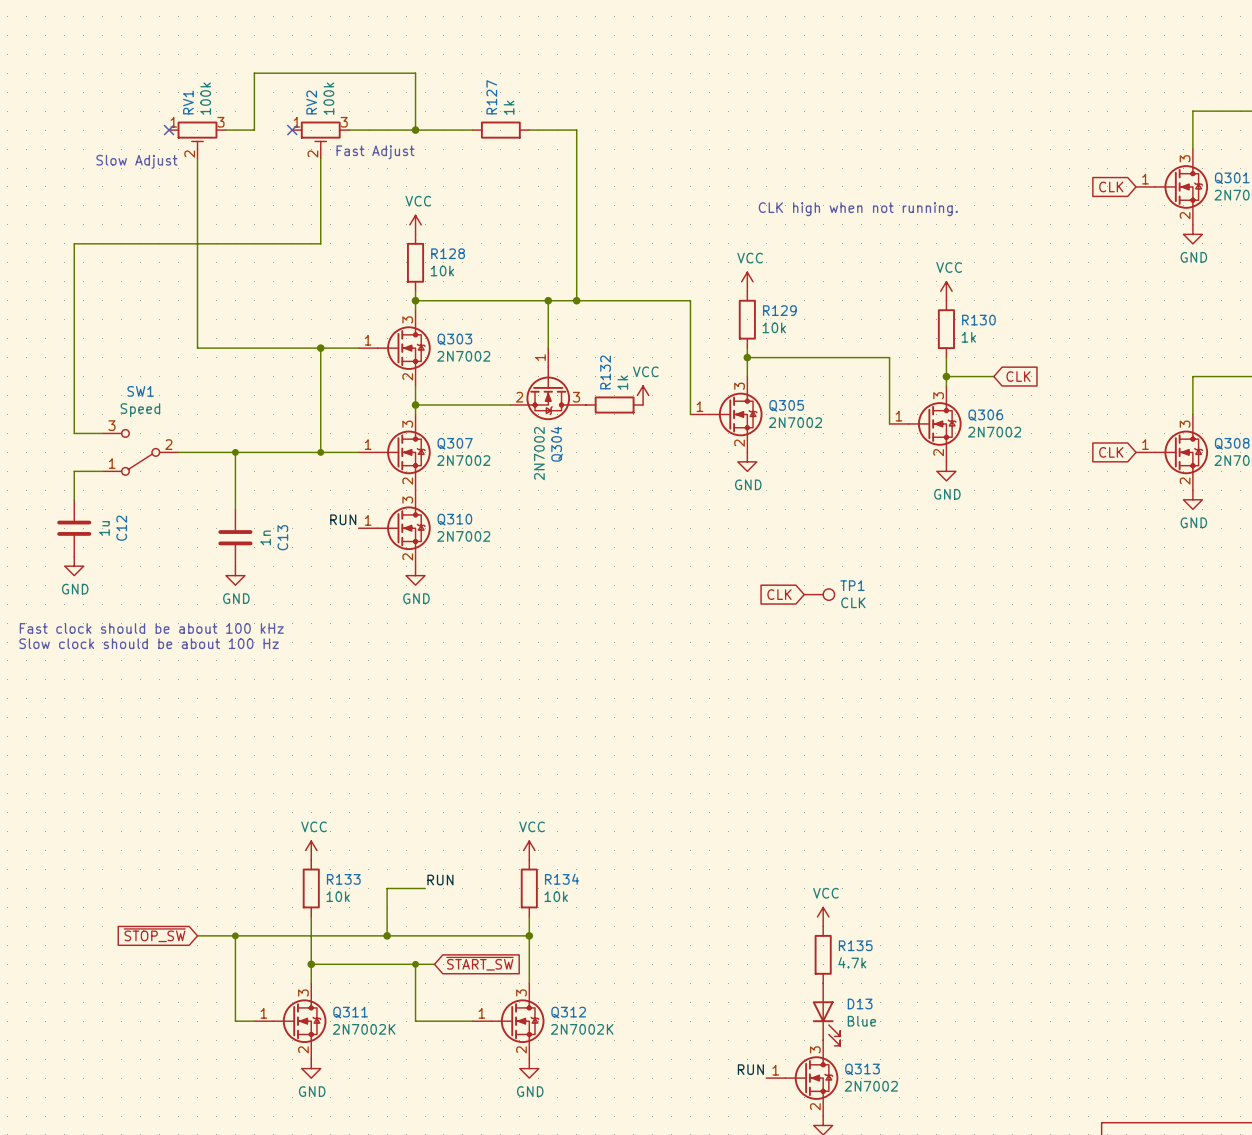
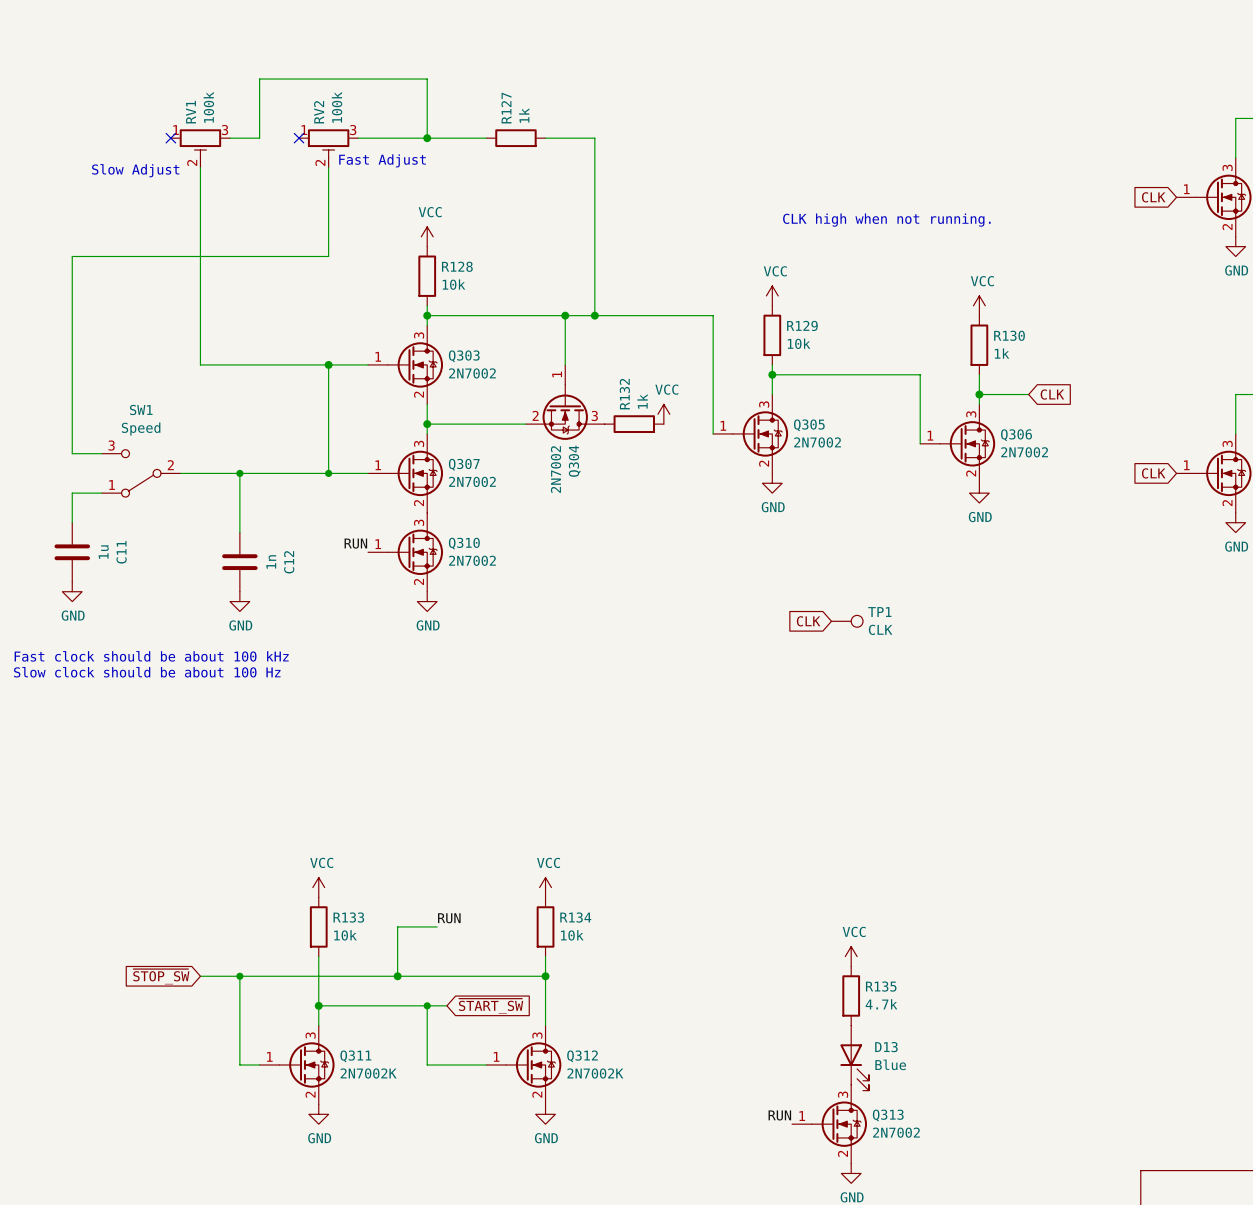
C12 name: C12 (121, 528) -> C11 (121, 552)
C13 name: C13 (282, 537) -> C12 (289, 562)

